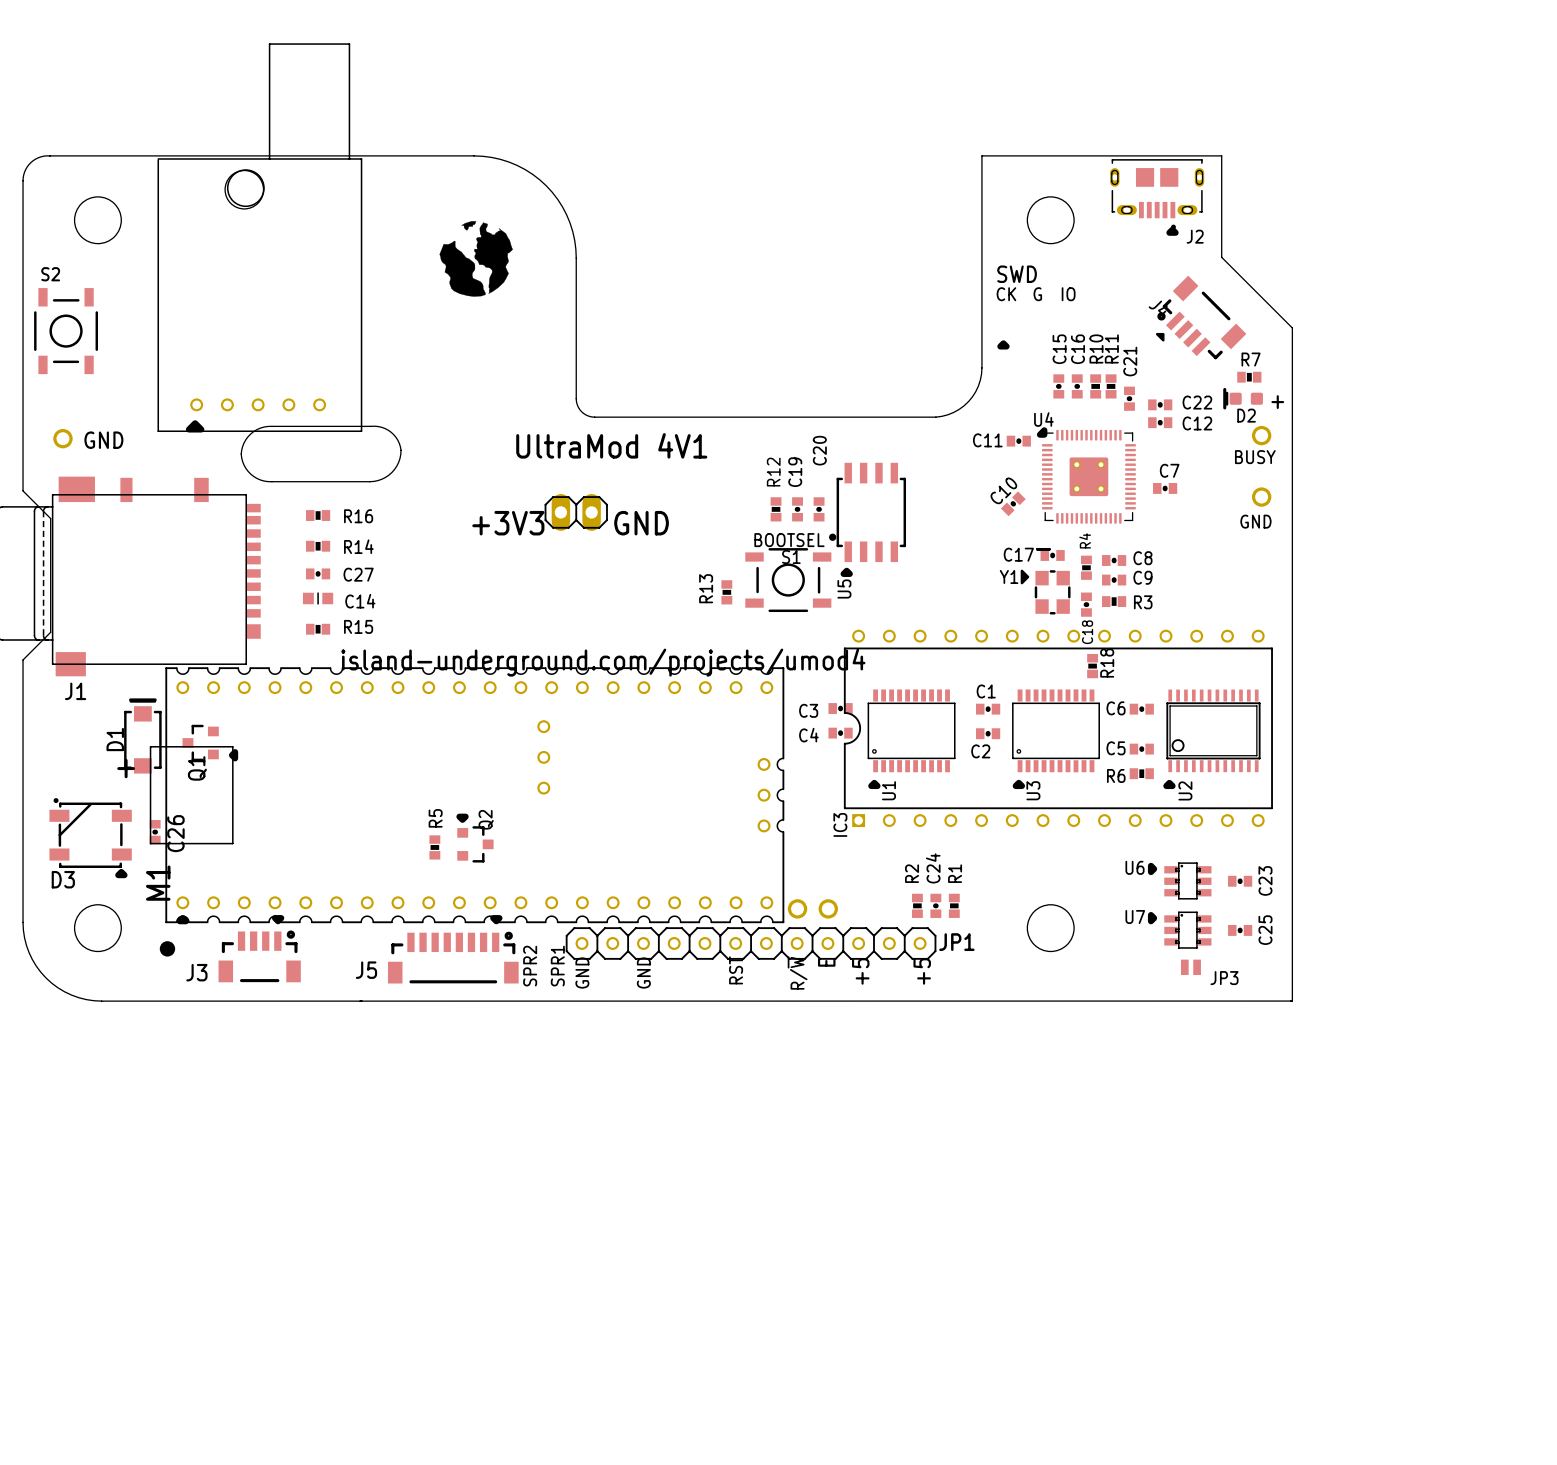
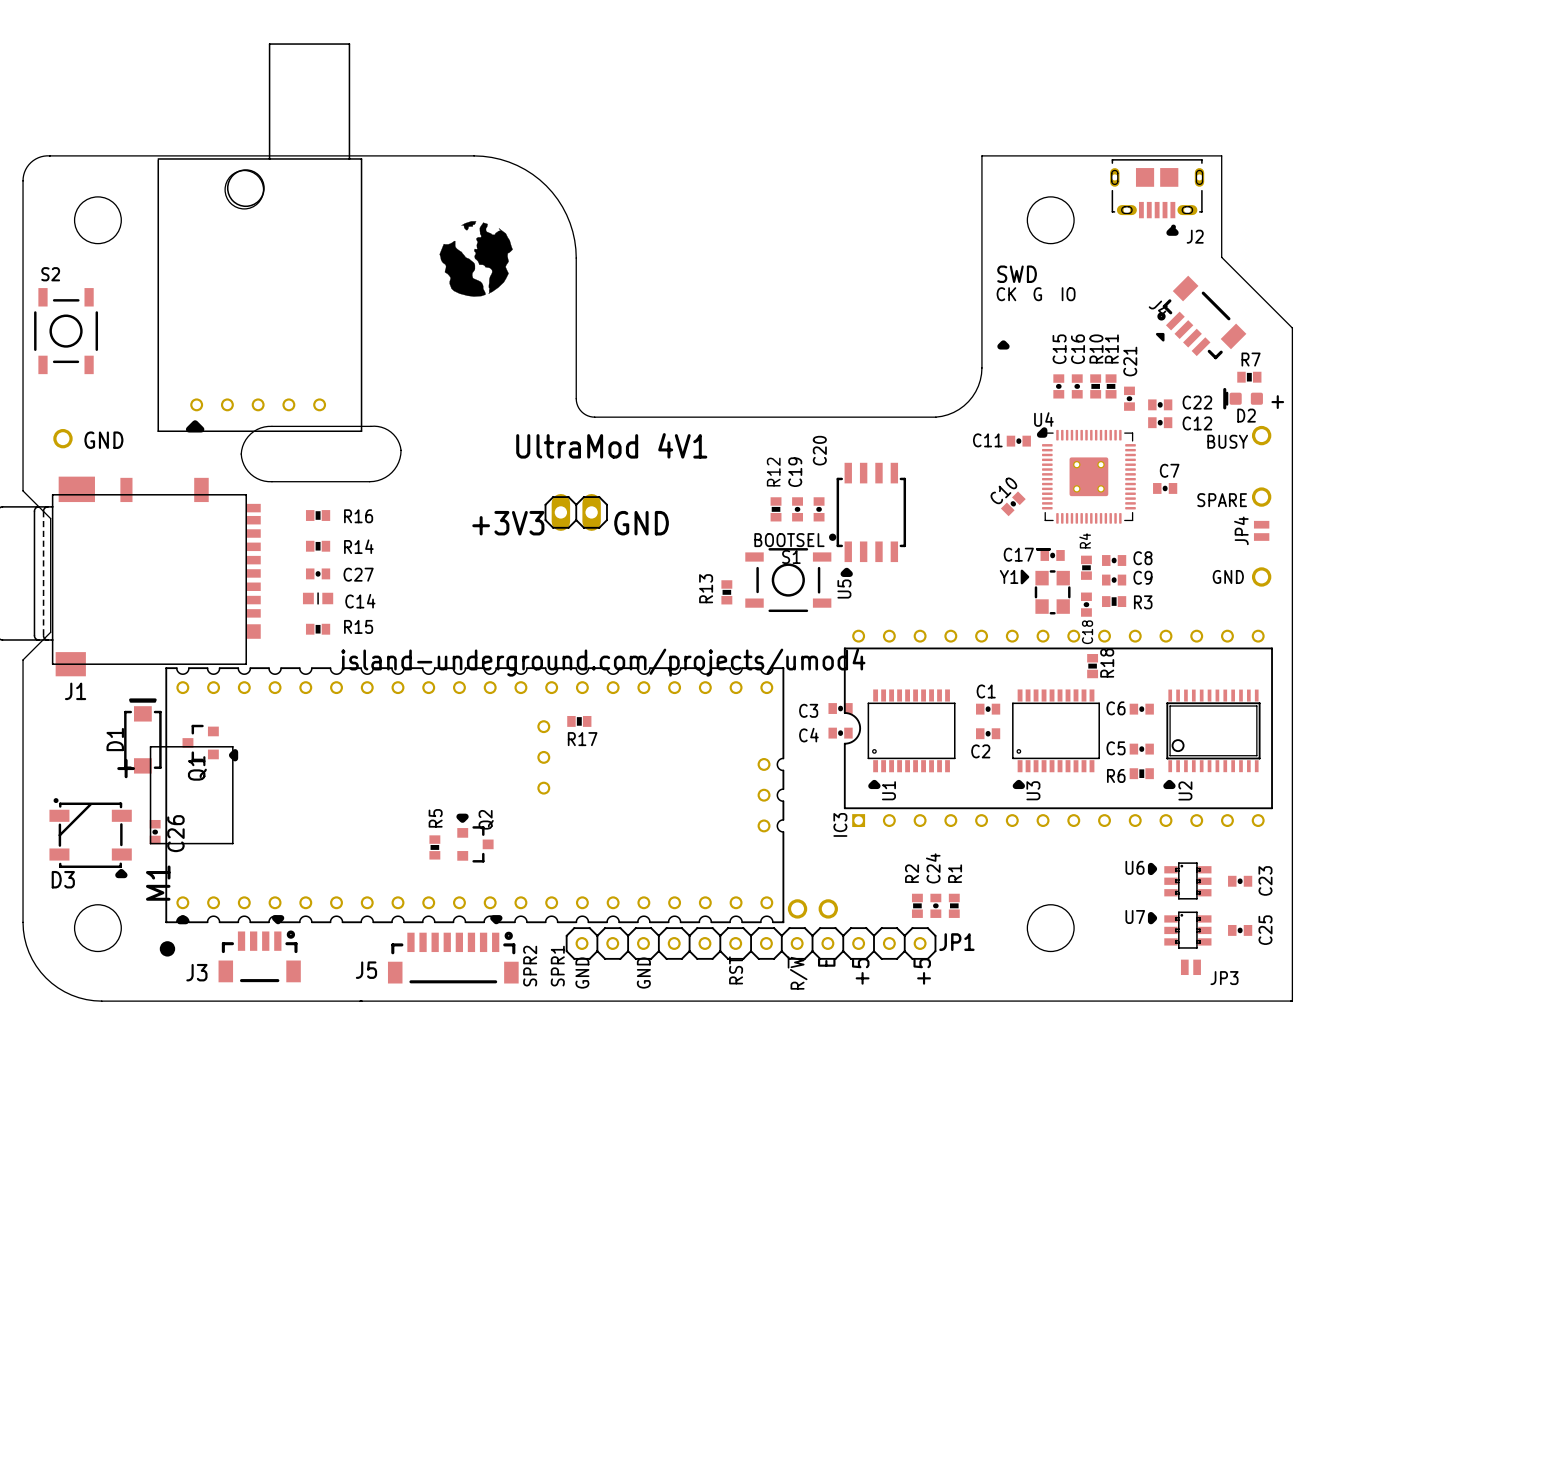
text position: BUSY (1255, 457) -> BUSY (1227, 441)
text: none -> SPARE (1222, 500)
text position: GND (1255, 521) -> GND (1228, 576)
JP4: none -> (1261, 530)
part: none -> (1261, 576)
R17: none -> (579, 721)

